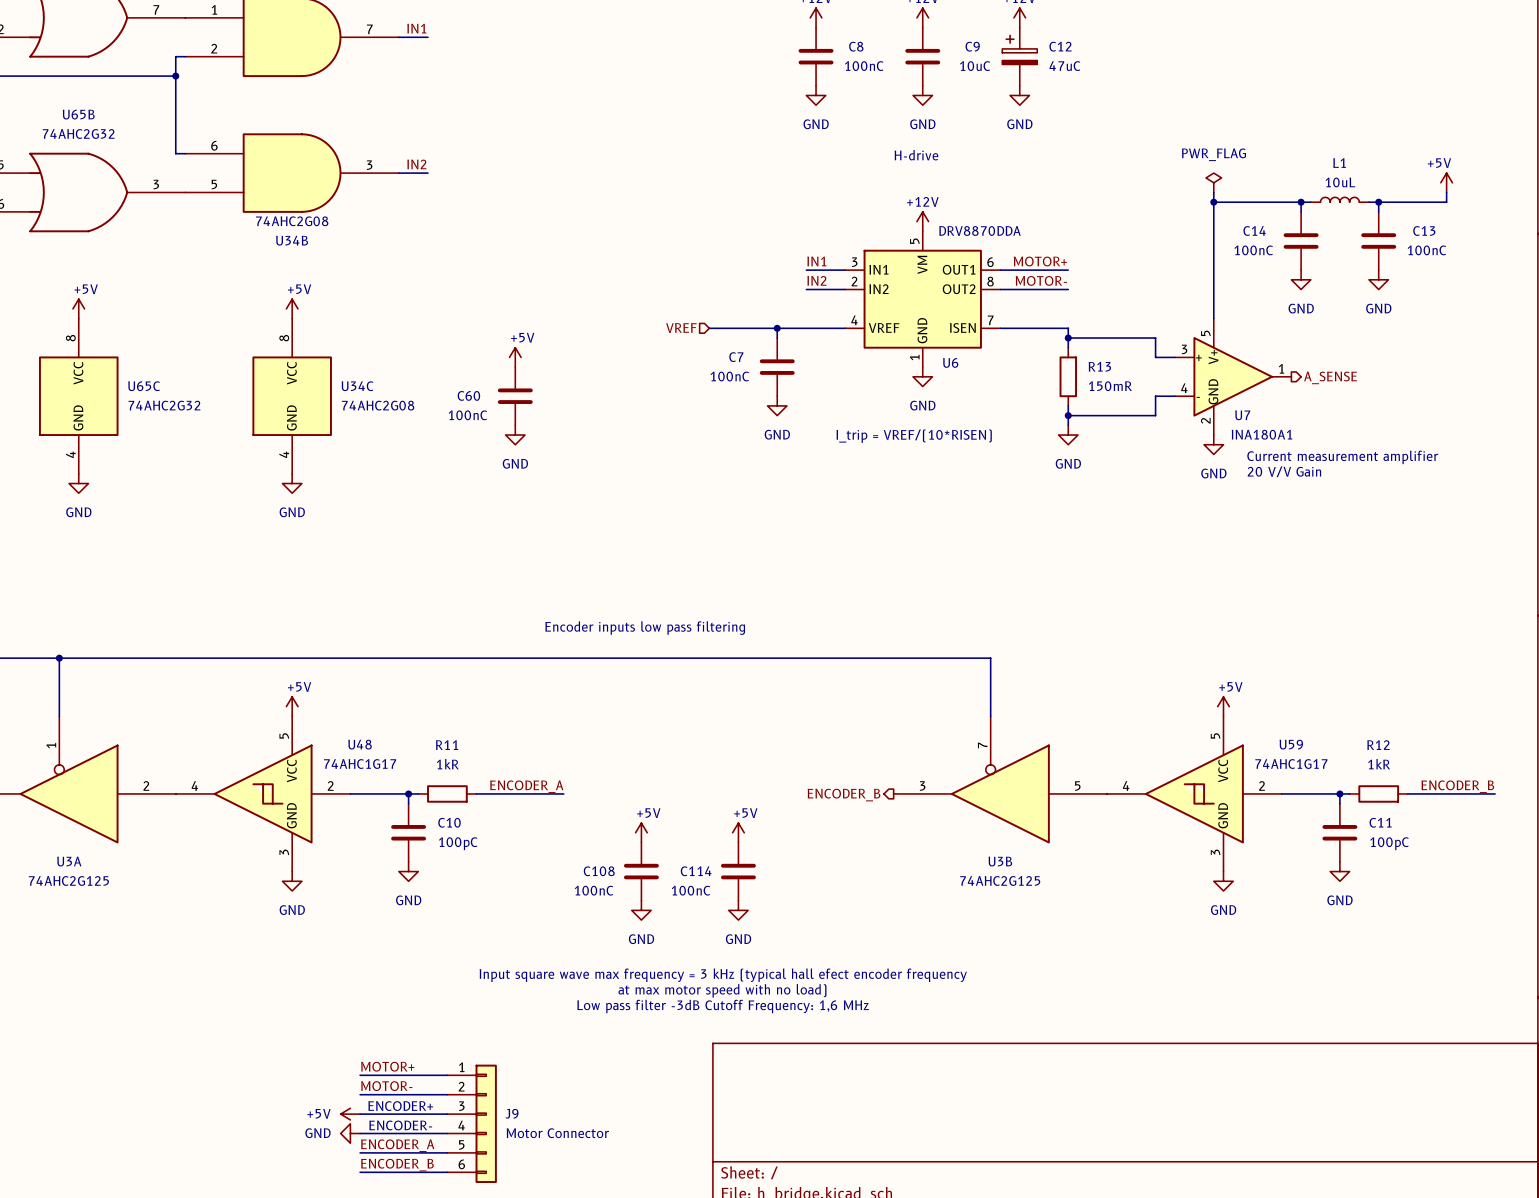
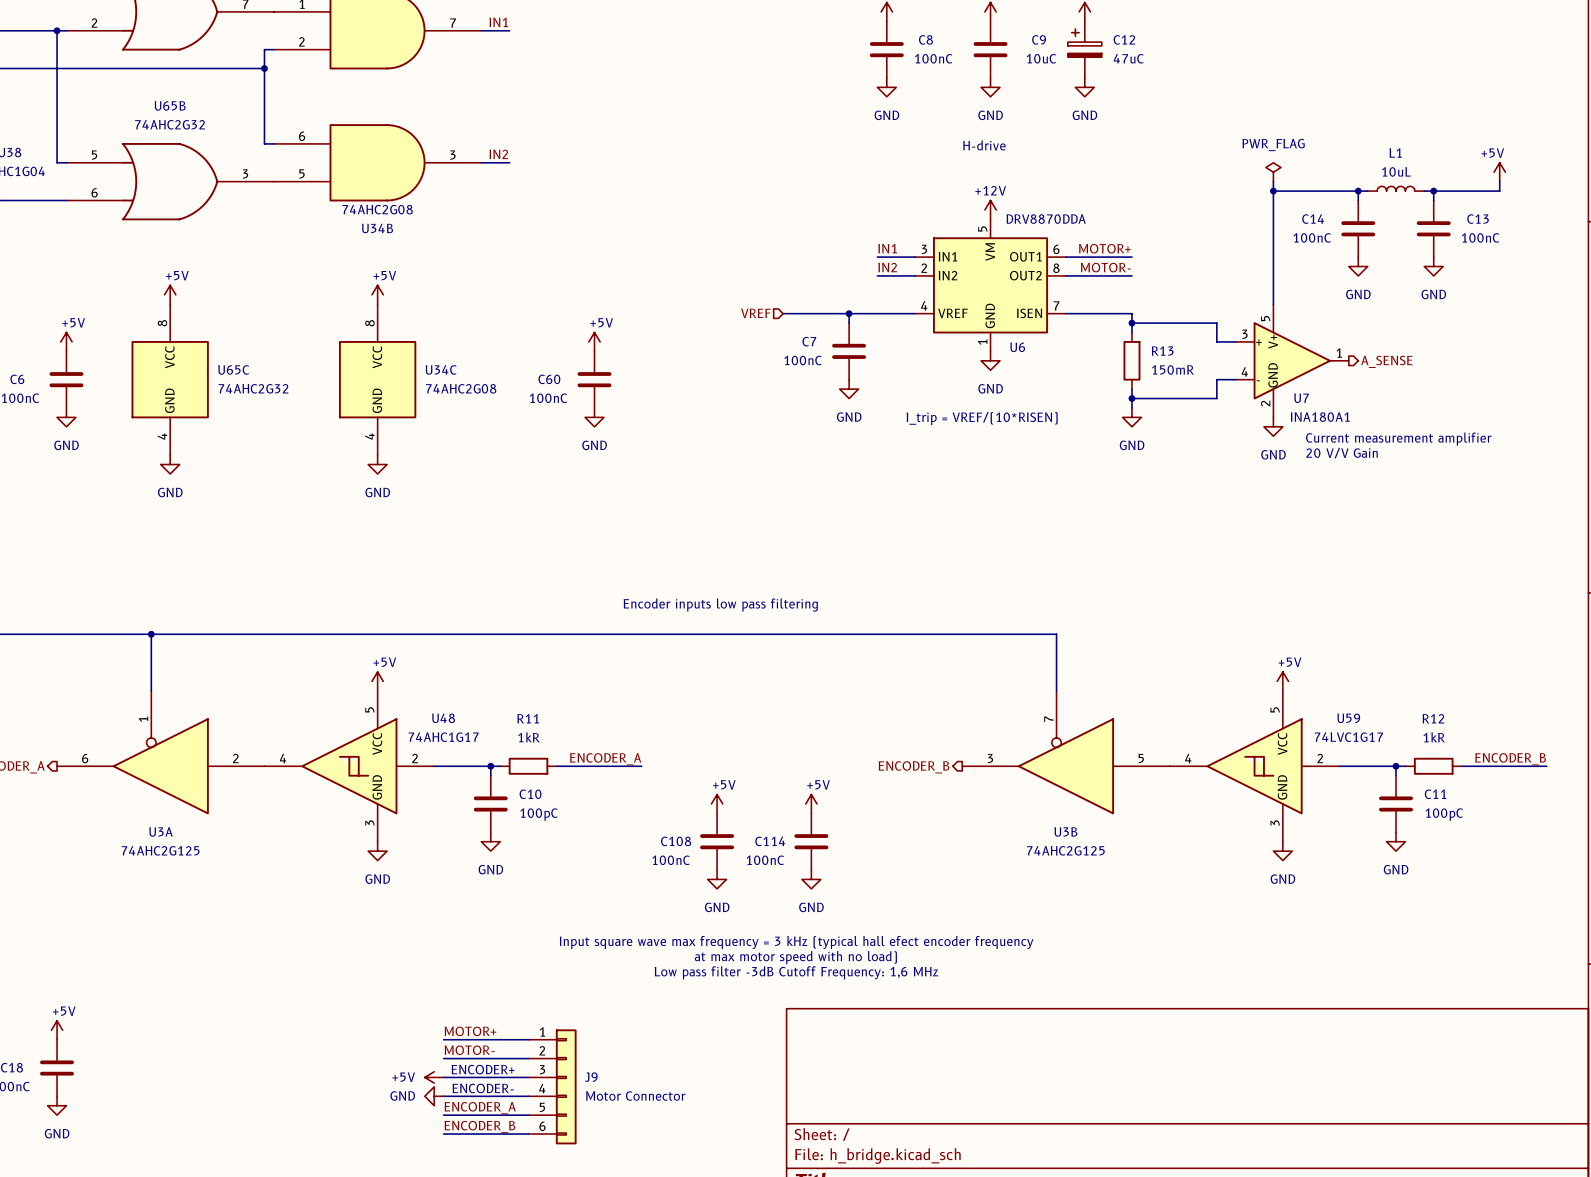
U59 value: 74AHC1G17 (1291, 764) -> 74LVC1G17 (1348, 737)

